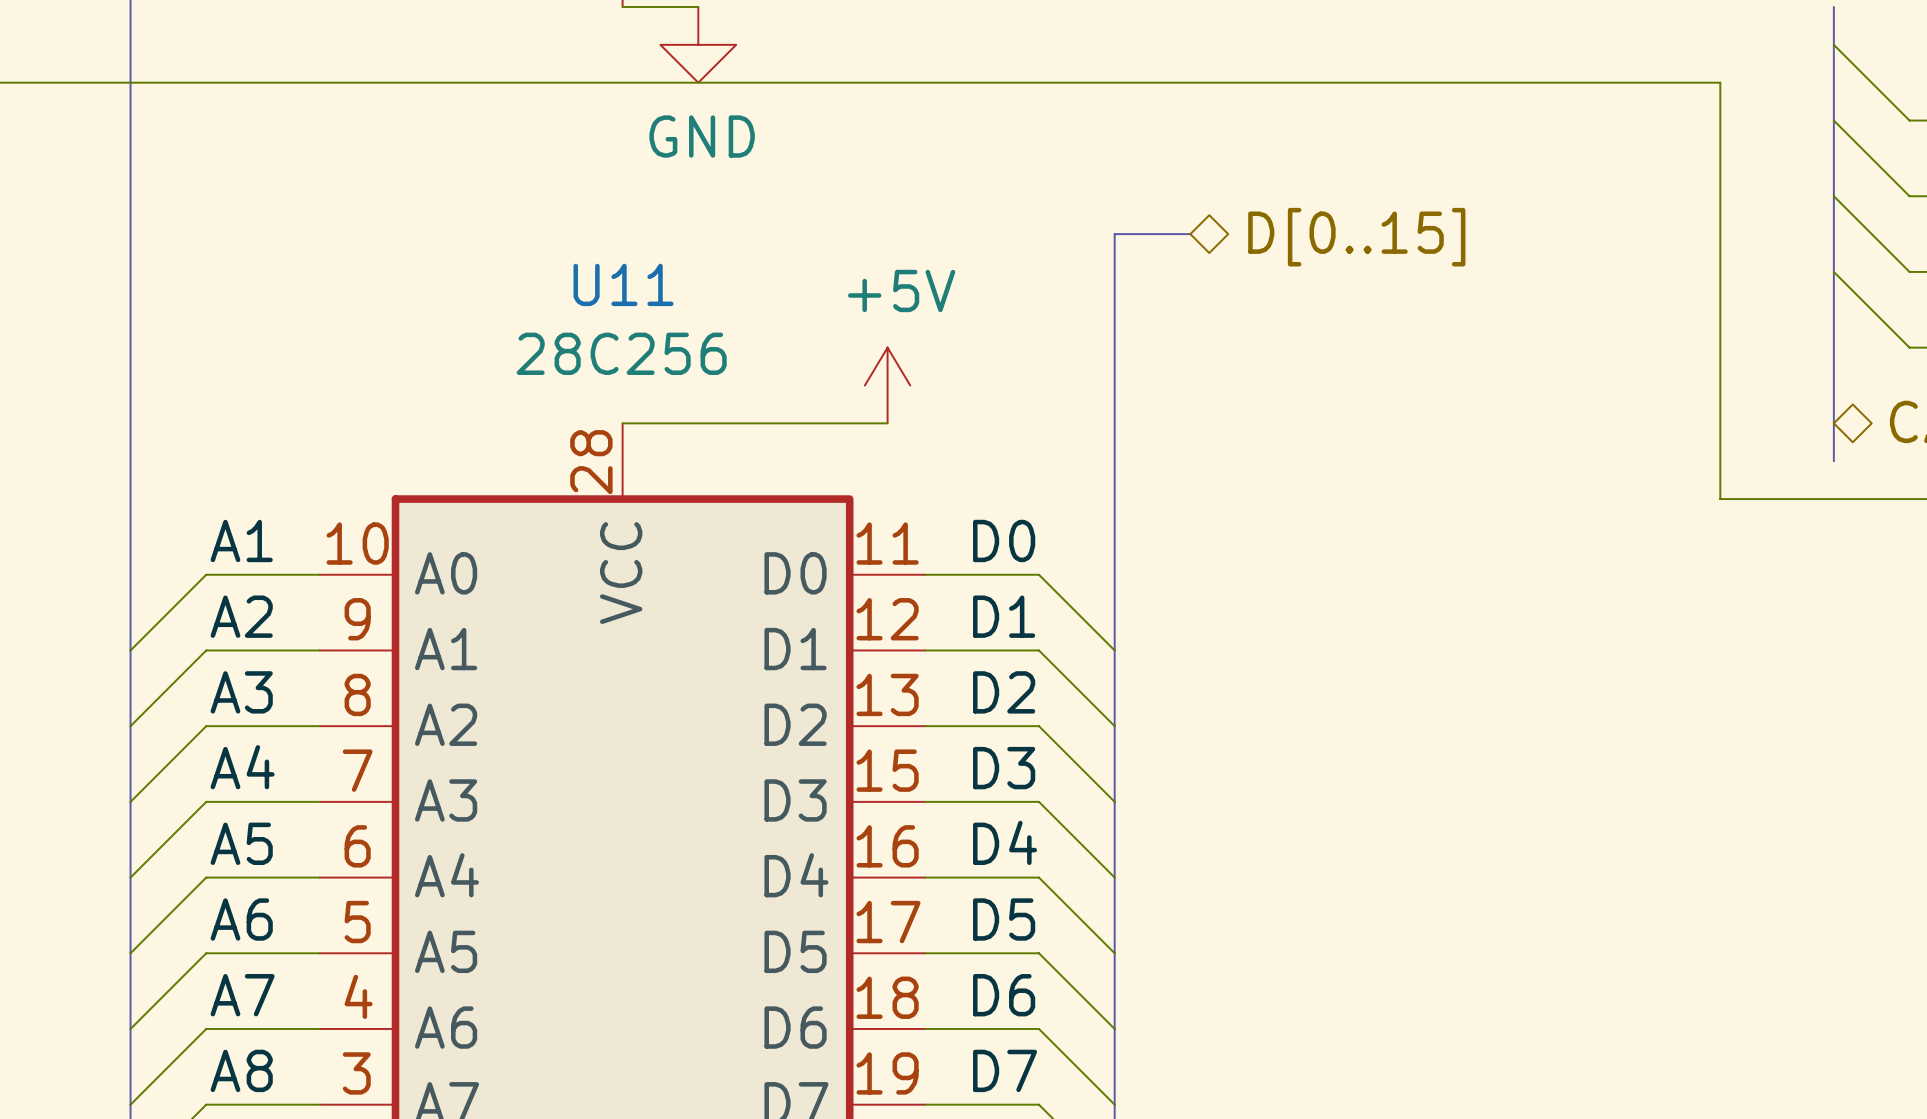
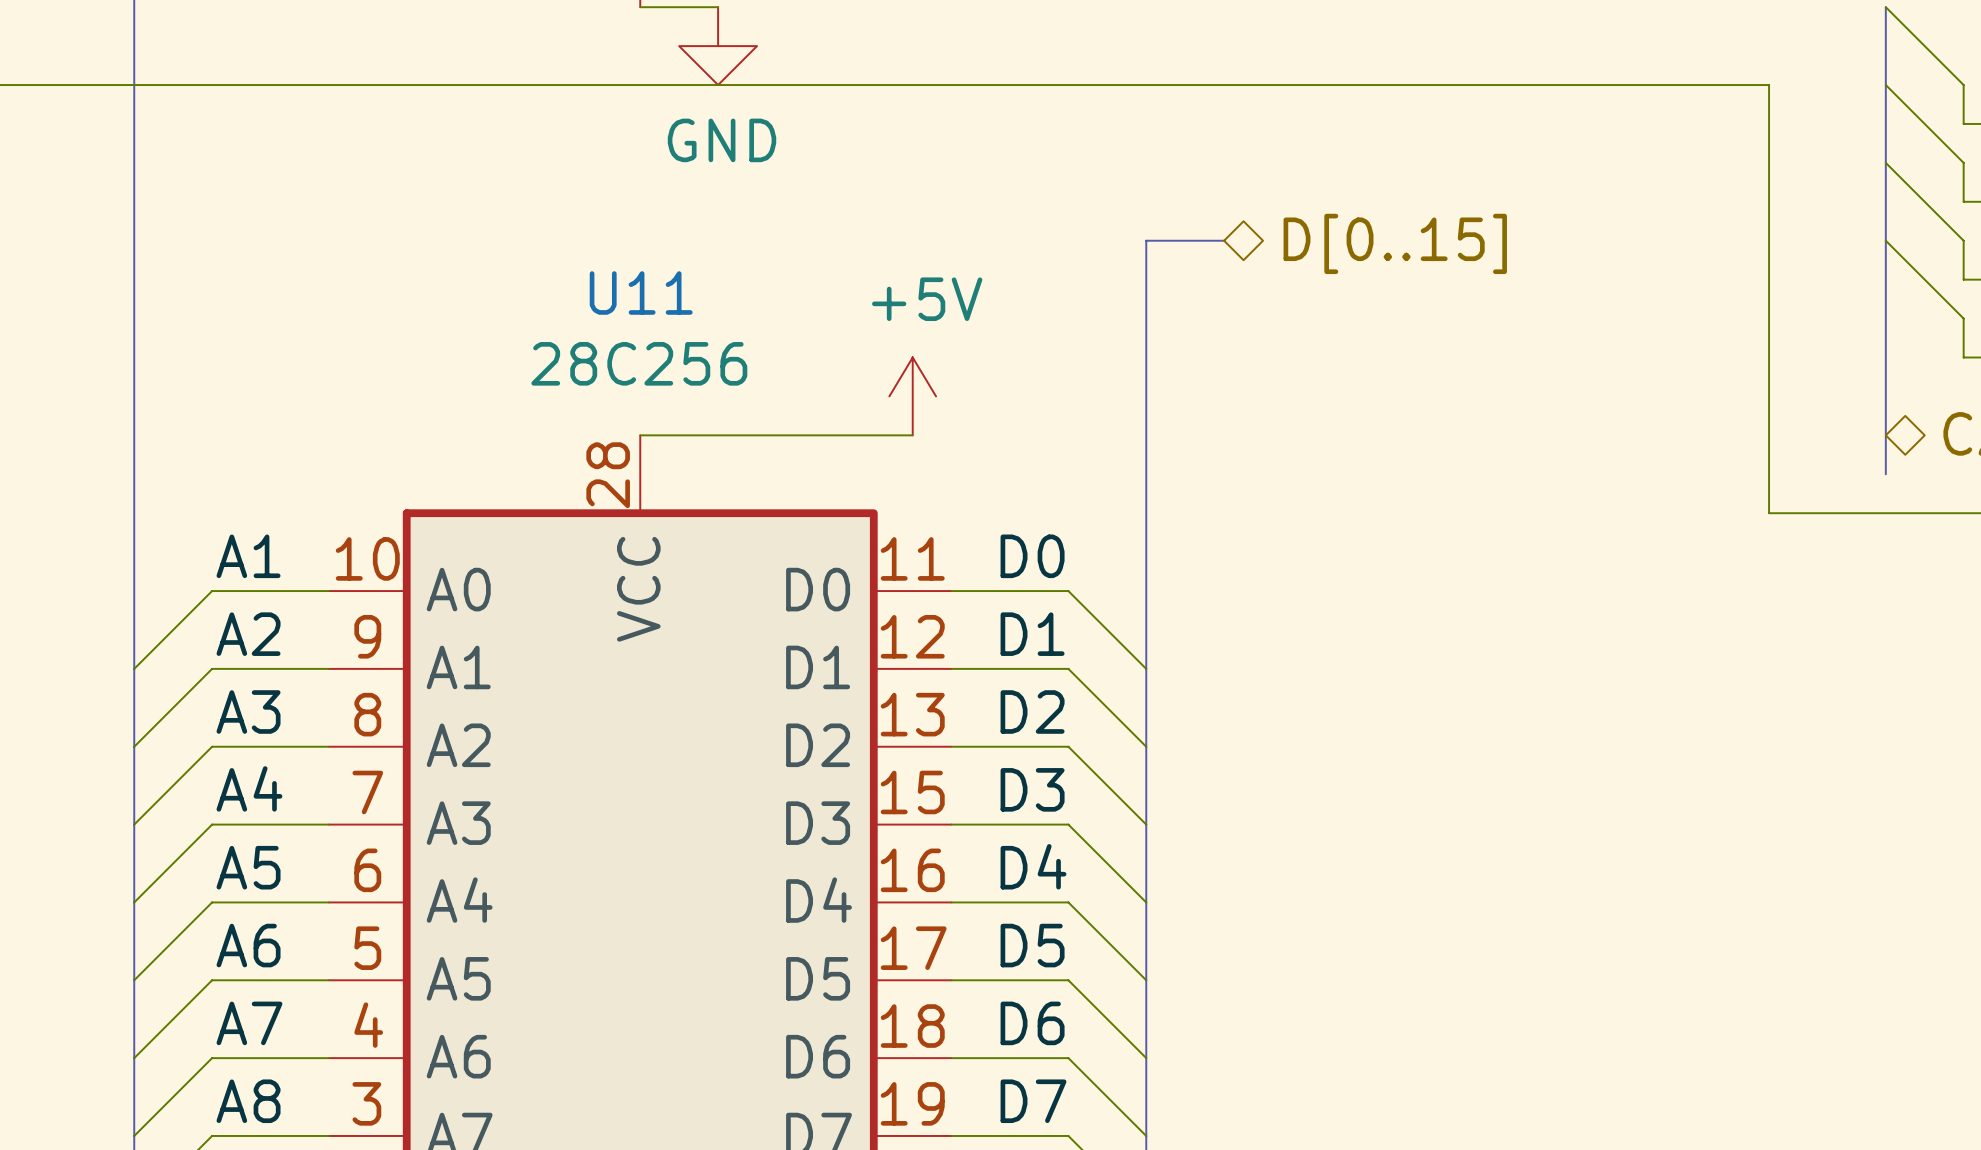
wire: (1833, 44) (1909, 120) -> (1885, 7) (1963, 85) (1963, 123)
wire: (1833, 120) (1909, 196) -> (1885, 85) (1963, 162) (1963, 201)
wire: (1833, 196) (1909, 271) -> (1885, 162) (1963, 240) (1963, 279)
wire: (1833, 271) (1909, 347) -> (1885, 240) (1963, 318) (1963, 357)

